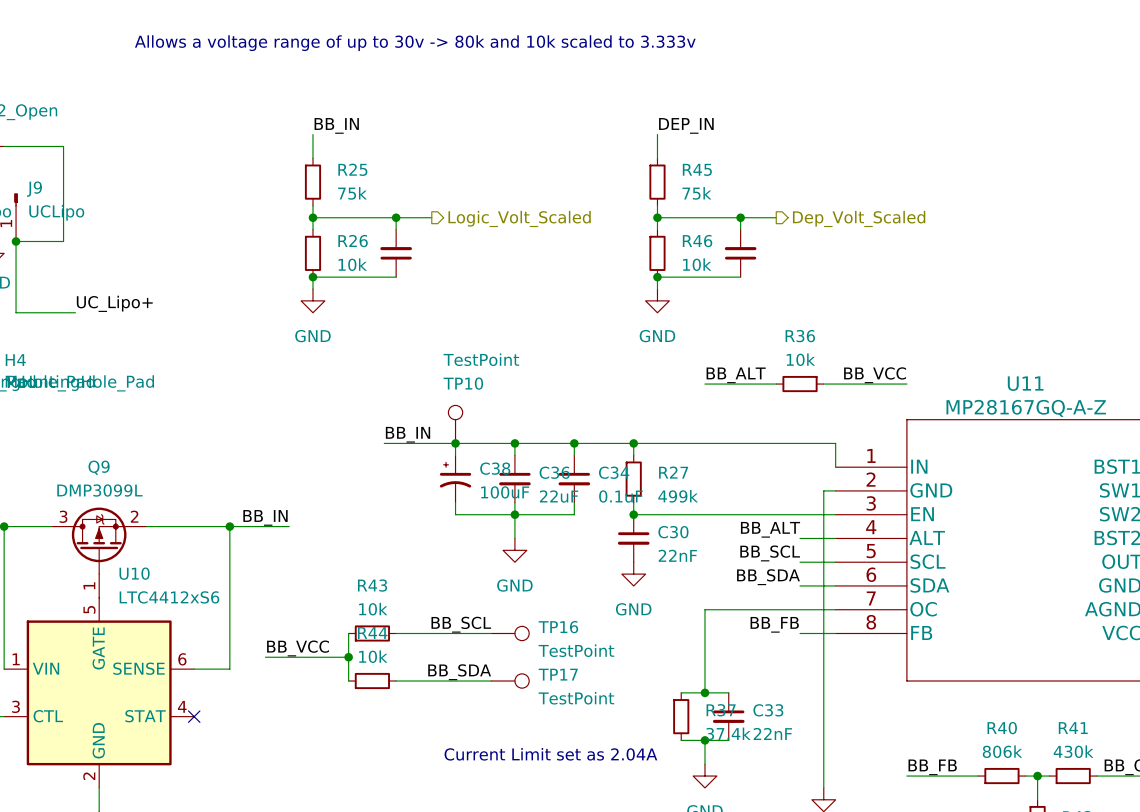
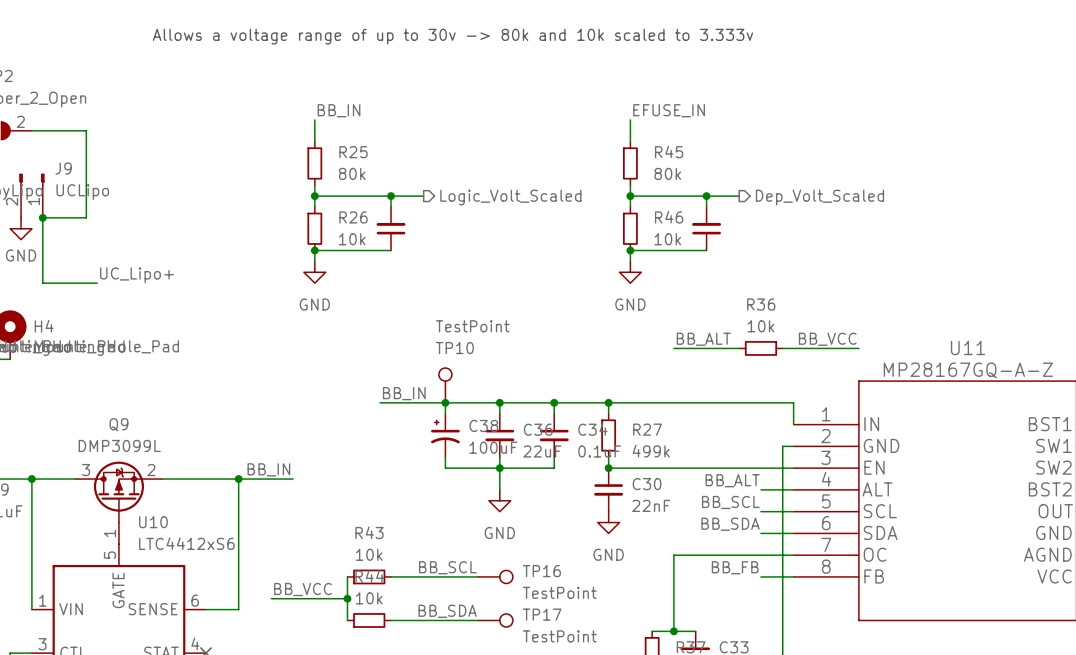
label: DEP_IN (686, 125) -> EFUSE_IN (669, 110)
R25 value: 75k (352, 193) -> 80k (352, 173)
R45 value: 75k (696, 193) -> 80k (667, 173)

